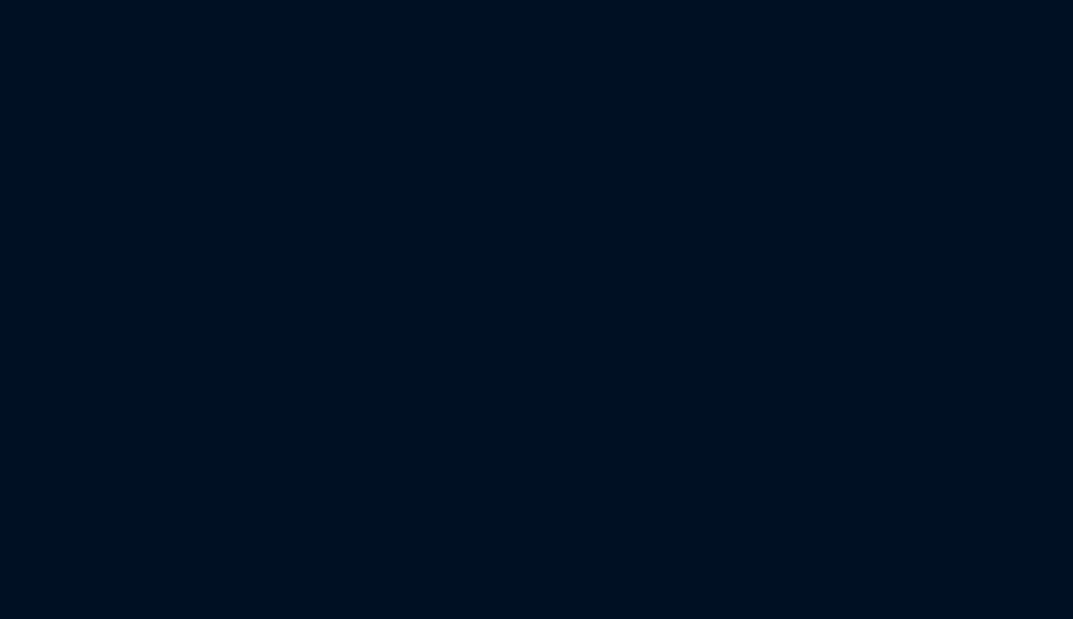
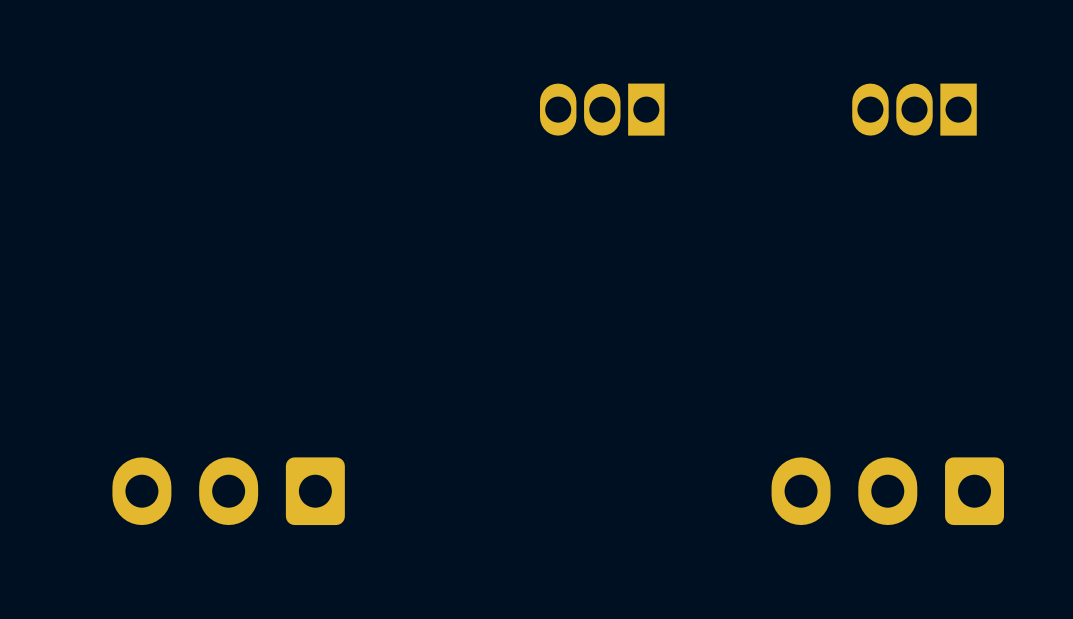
part: none -> (602, 109)
part: none -> (914, 109)
part: none -> (228, 491)
part: none -> (887, 491)

